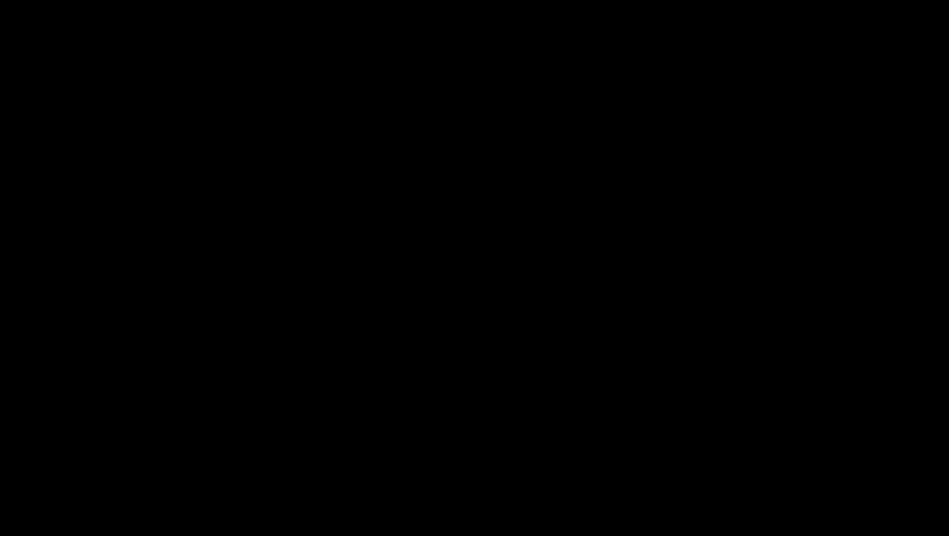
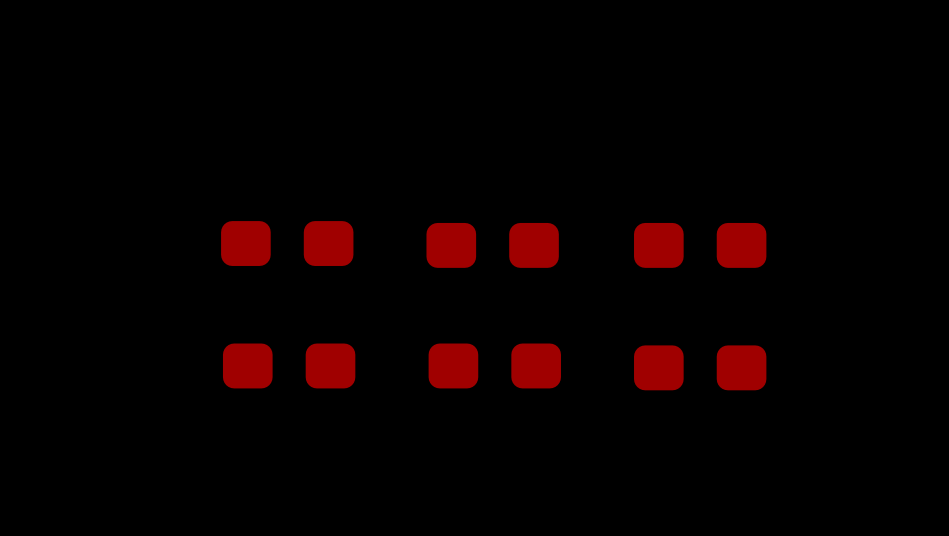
part: none -> (287, 243)
part: none -> (492, 245)
part: none -> (700, 245)
part: none -> (289, 365)
part: none -> (494, 365)
part: none -> (700, 367)

